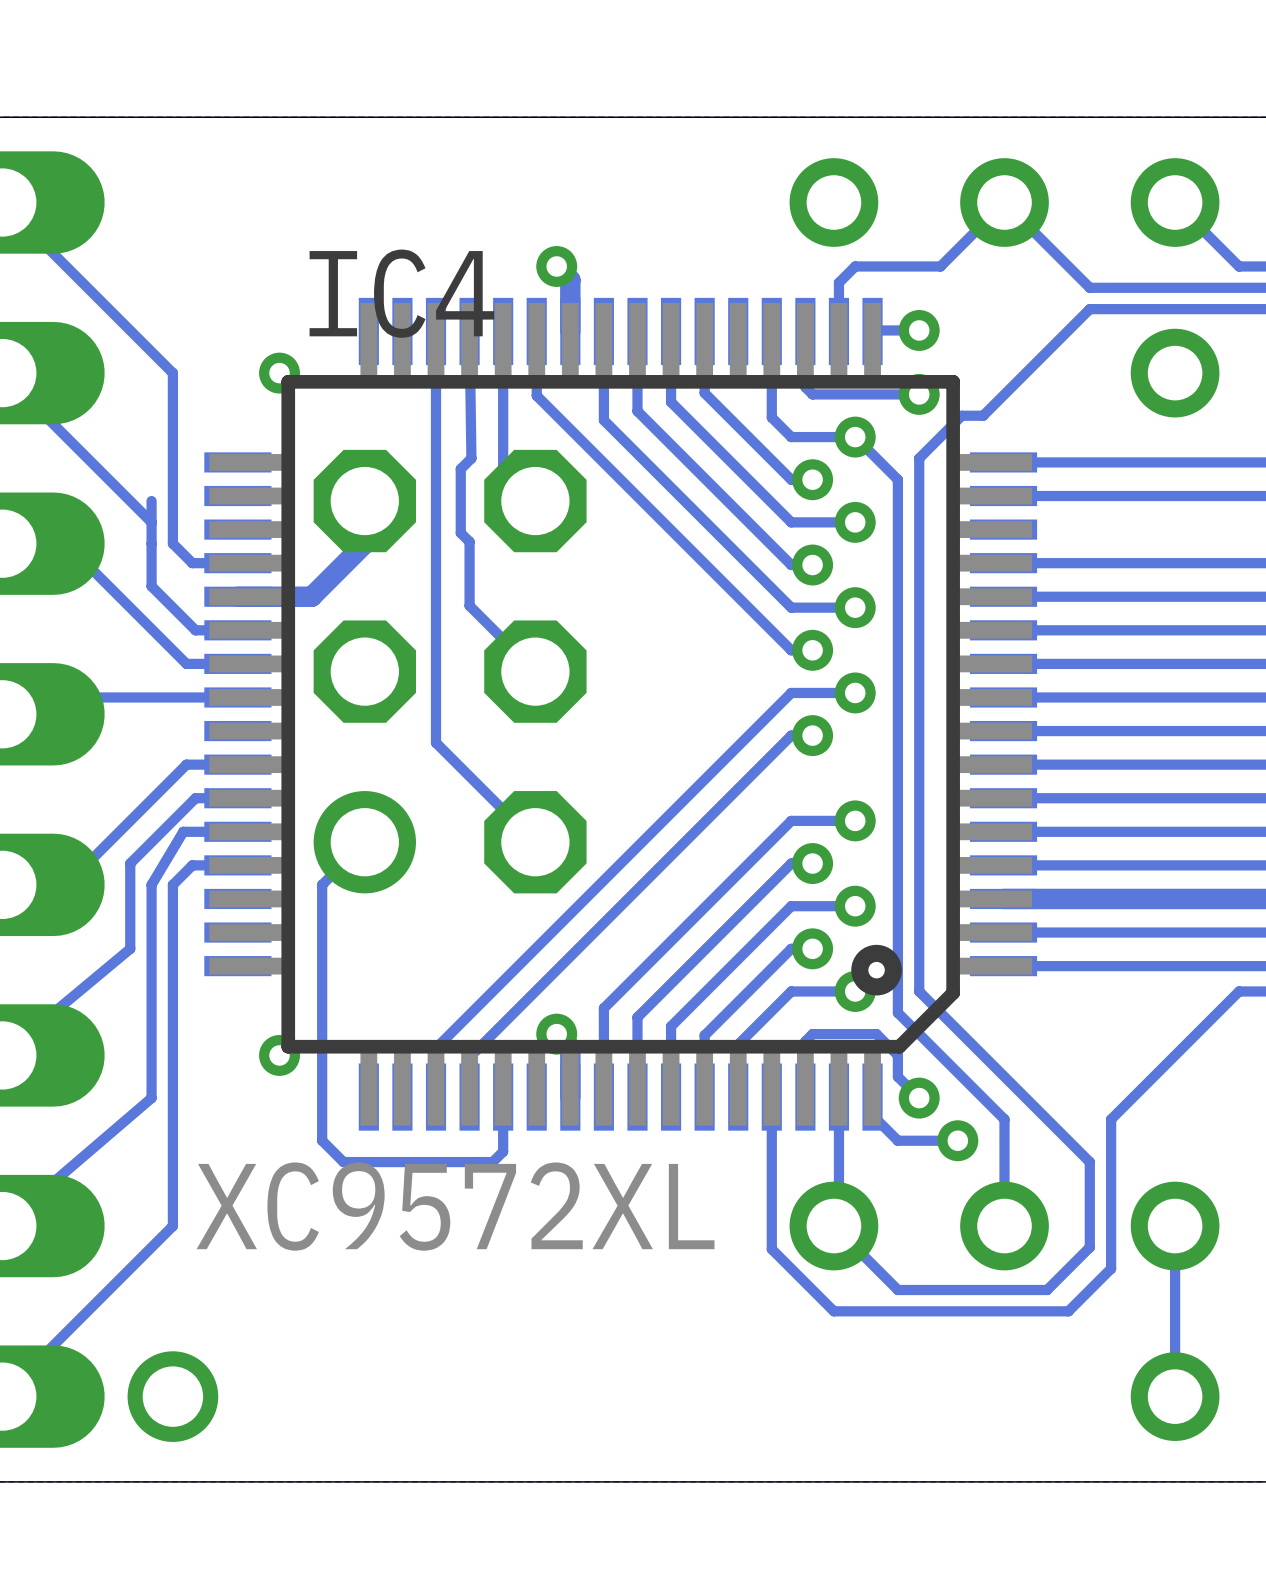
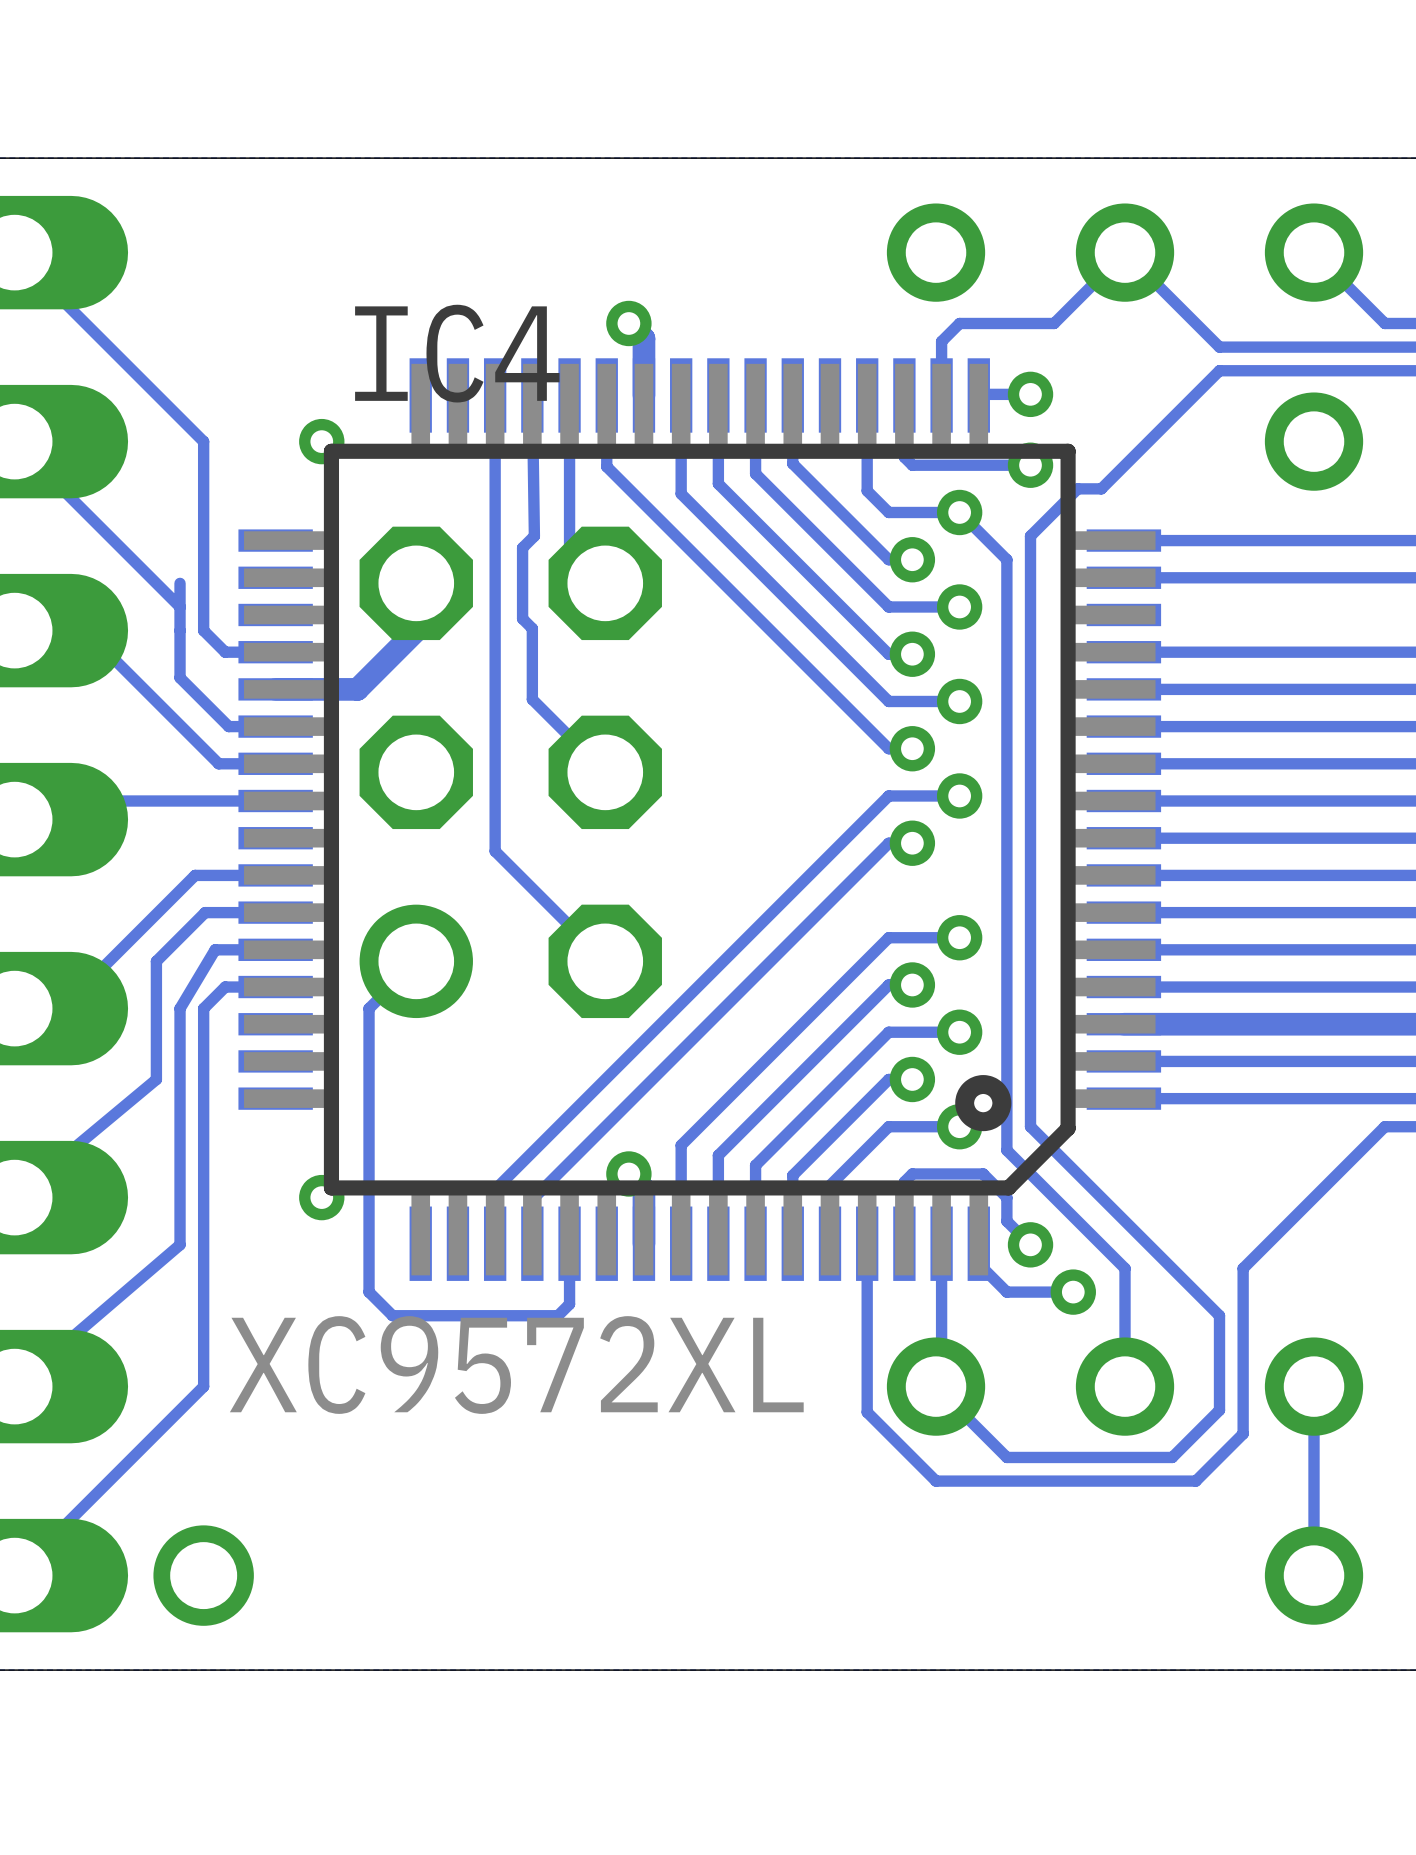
track: (186, 764) (66, 884) (44, 884) -> (218, 875) (195, 875) (61, 1008)
track: (195, 798) (130, 863) -> (228, 912) (205, 912) (156, 961) (156, 984)

